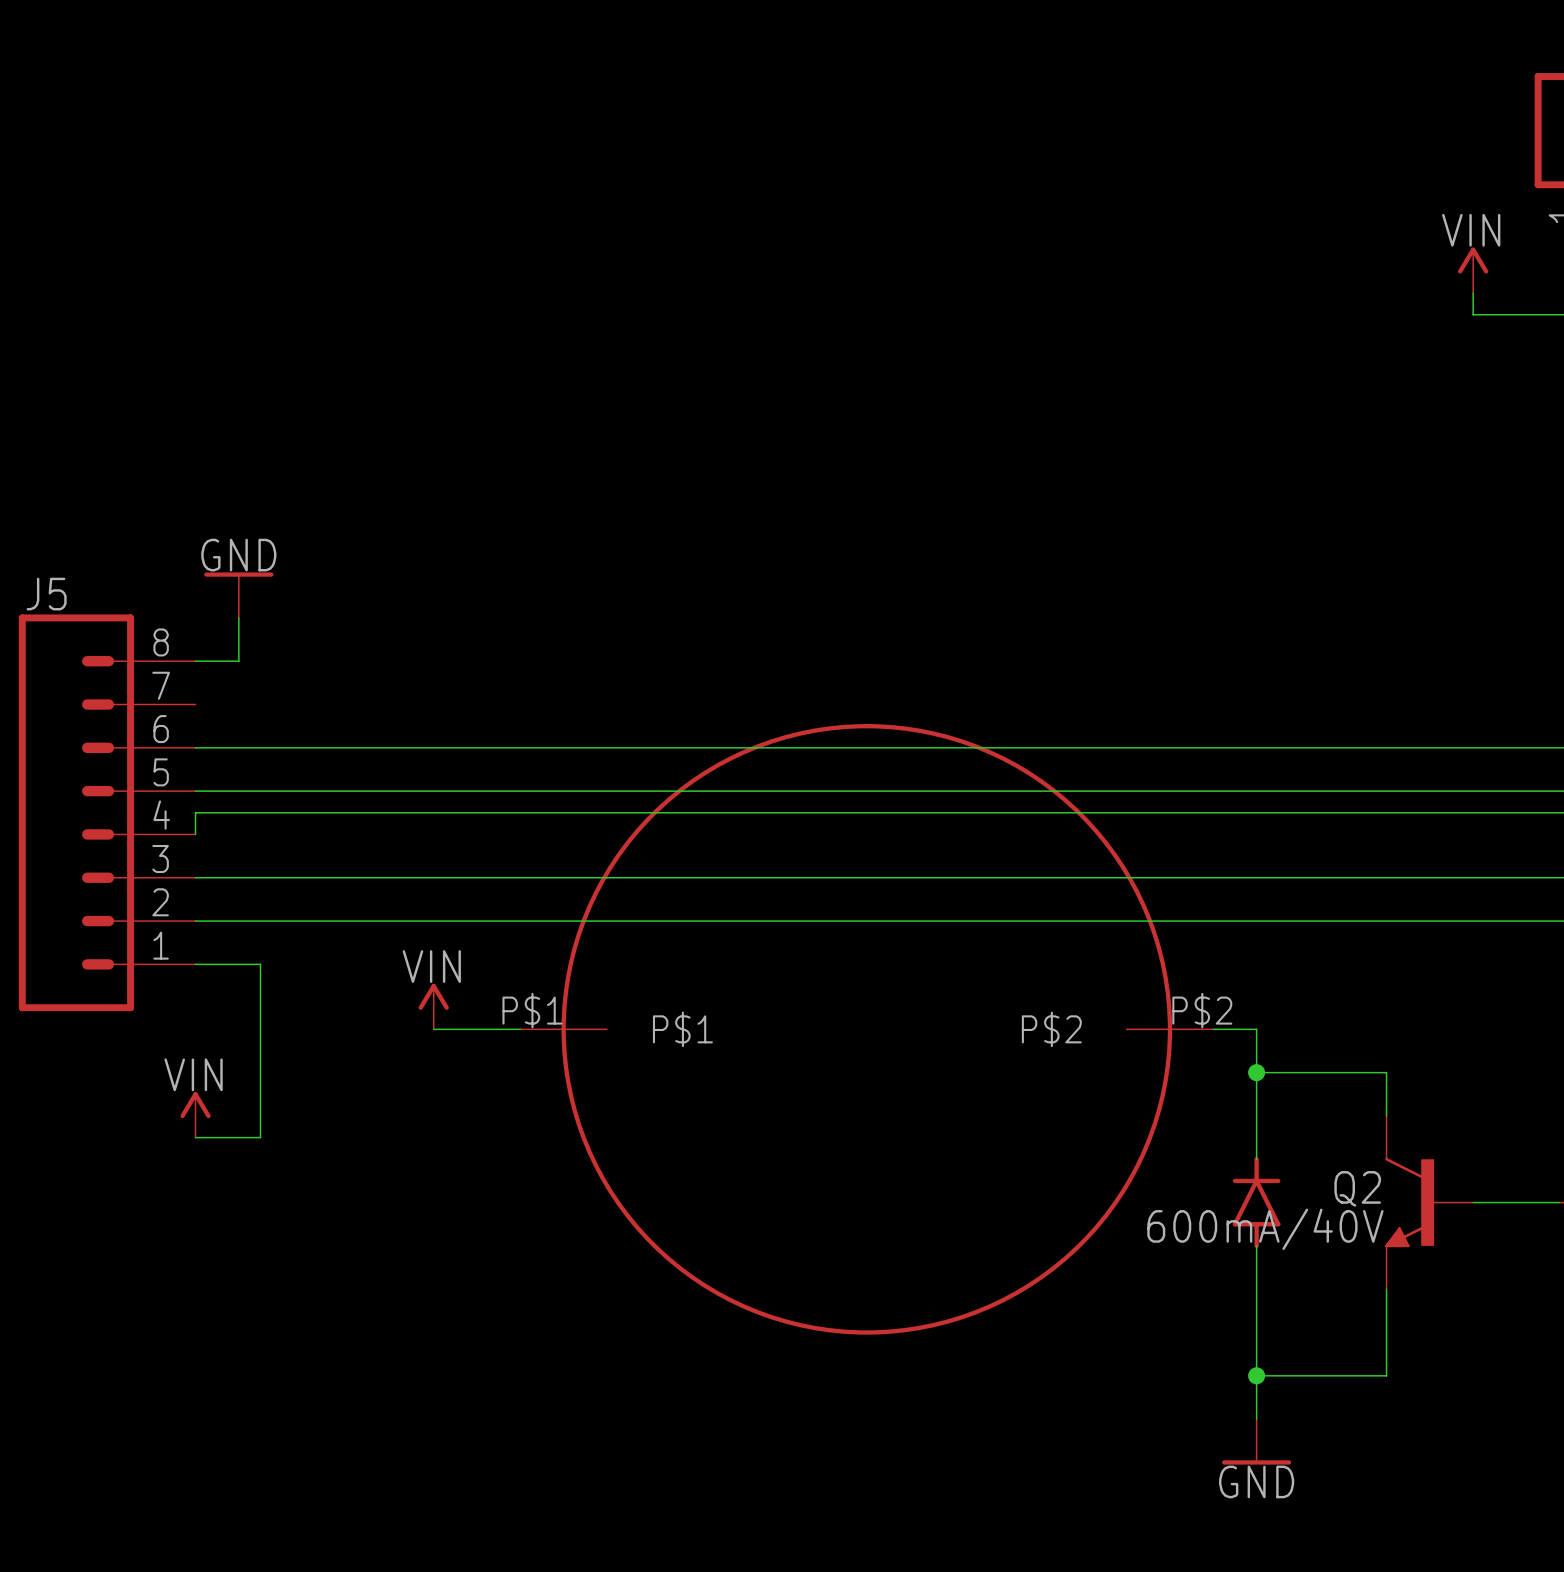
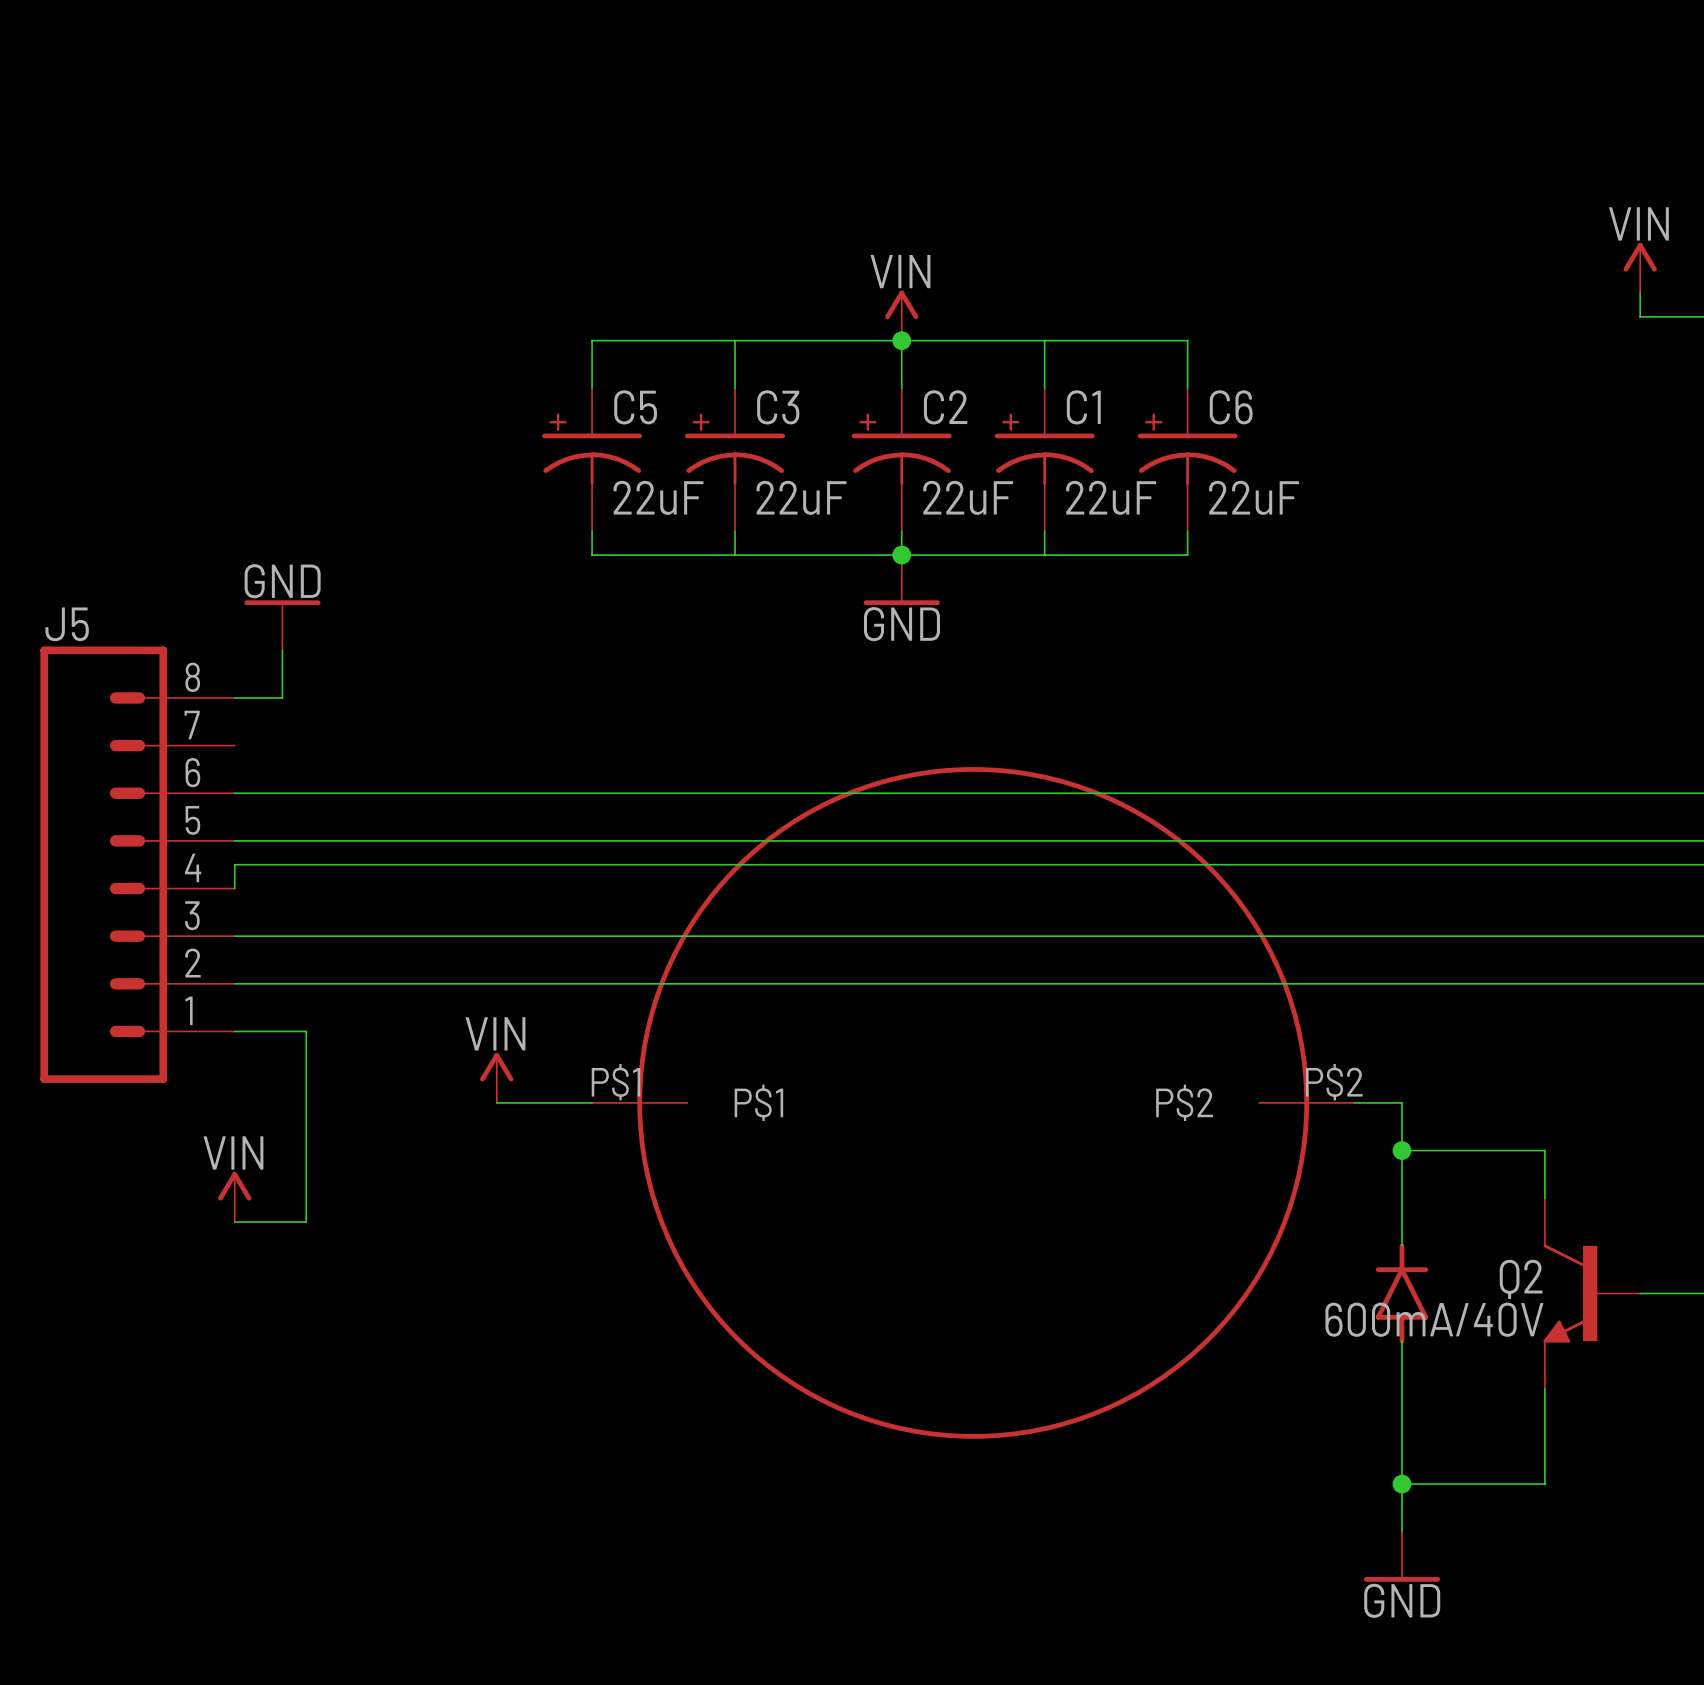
power symbol: none -> VIN (901, 315)
wire: none -> (735, 340) (735, 388)
wire: none -> (901, 340) (901, 388)
junction: none -> (901, 340)
wire: none -> (1044, 340) (1044, 388)
wire: none -> (592, 388) (592, 340) (1187, 340) (1187, 388)
C5: none -> 22uF (592, 459)
C3: none -> 22uF (735, 459)
C2: none -> 22uF (901, 459)
C1: none -> 22uF (1044, 459)
C6: none -> 22uF (1187, 459)
wire: none -> (592, 531) (592, 555) (1187, 555) (1187, 531)
wire: none -> (735, 531) (735, 555)
wire: none -> (901, 531) (901, 555)
wire: none -> (1044, 531) (1044, 555)
junction: none -> (901, 555)
power symbol: none -> GND (901, 580)

